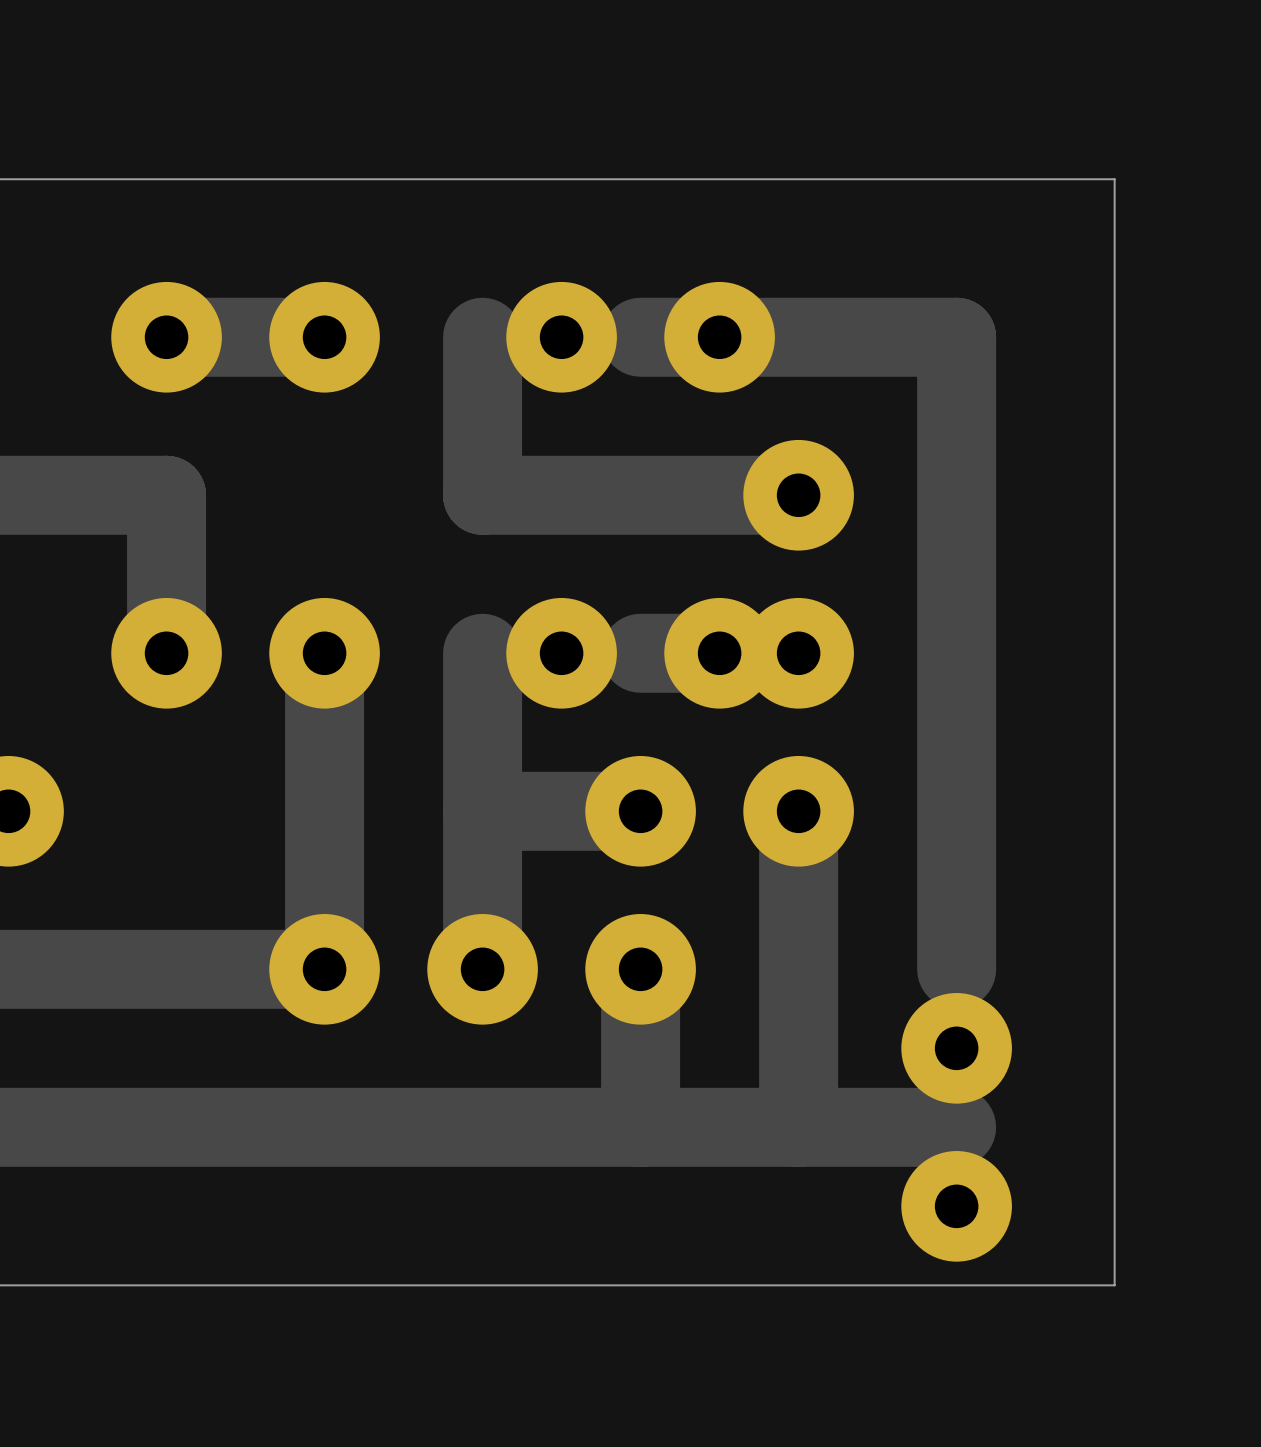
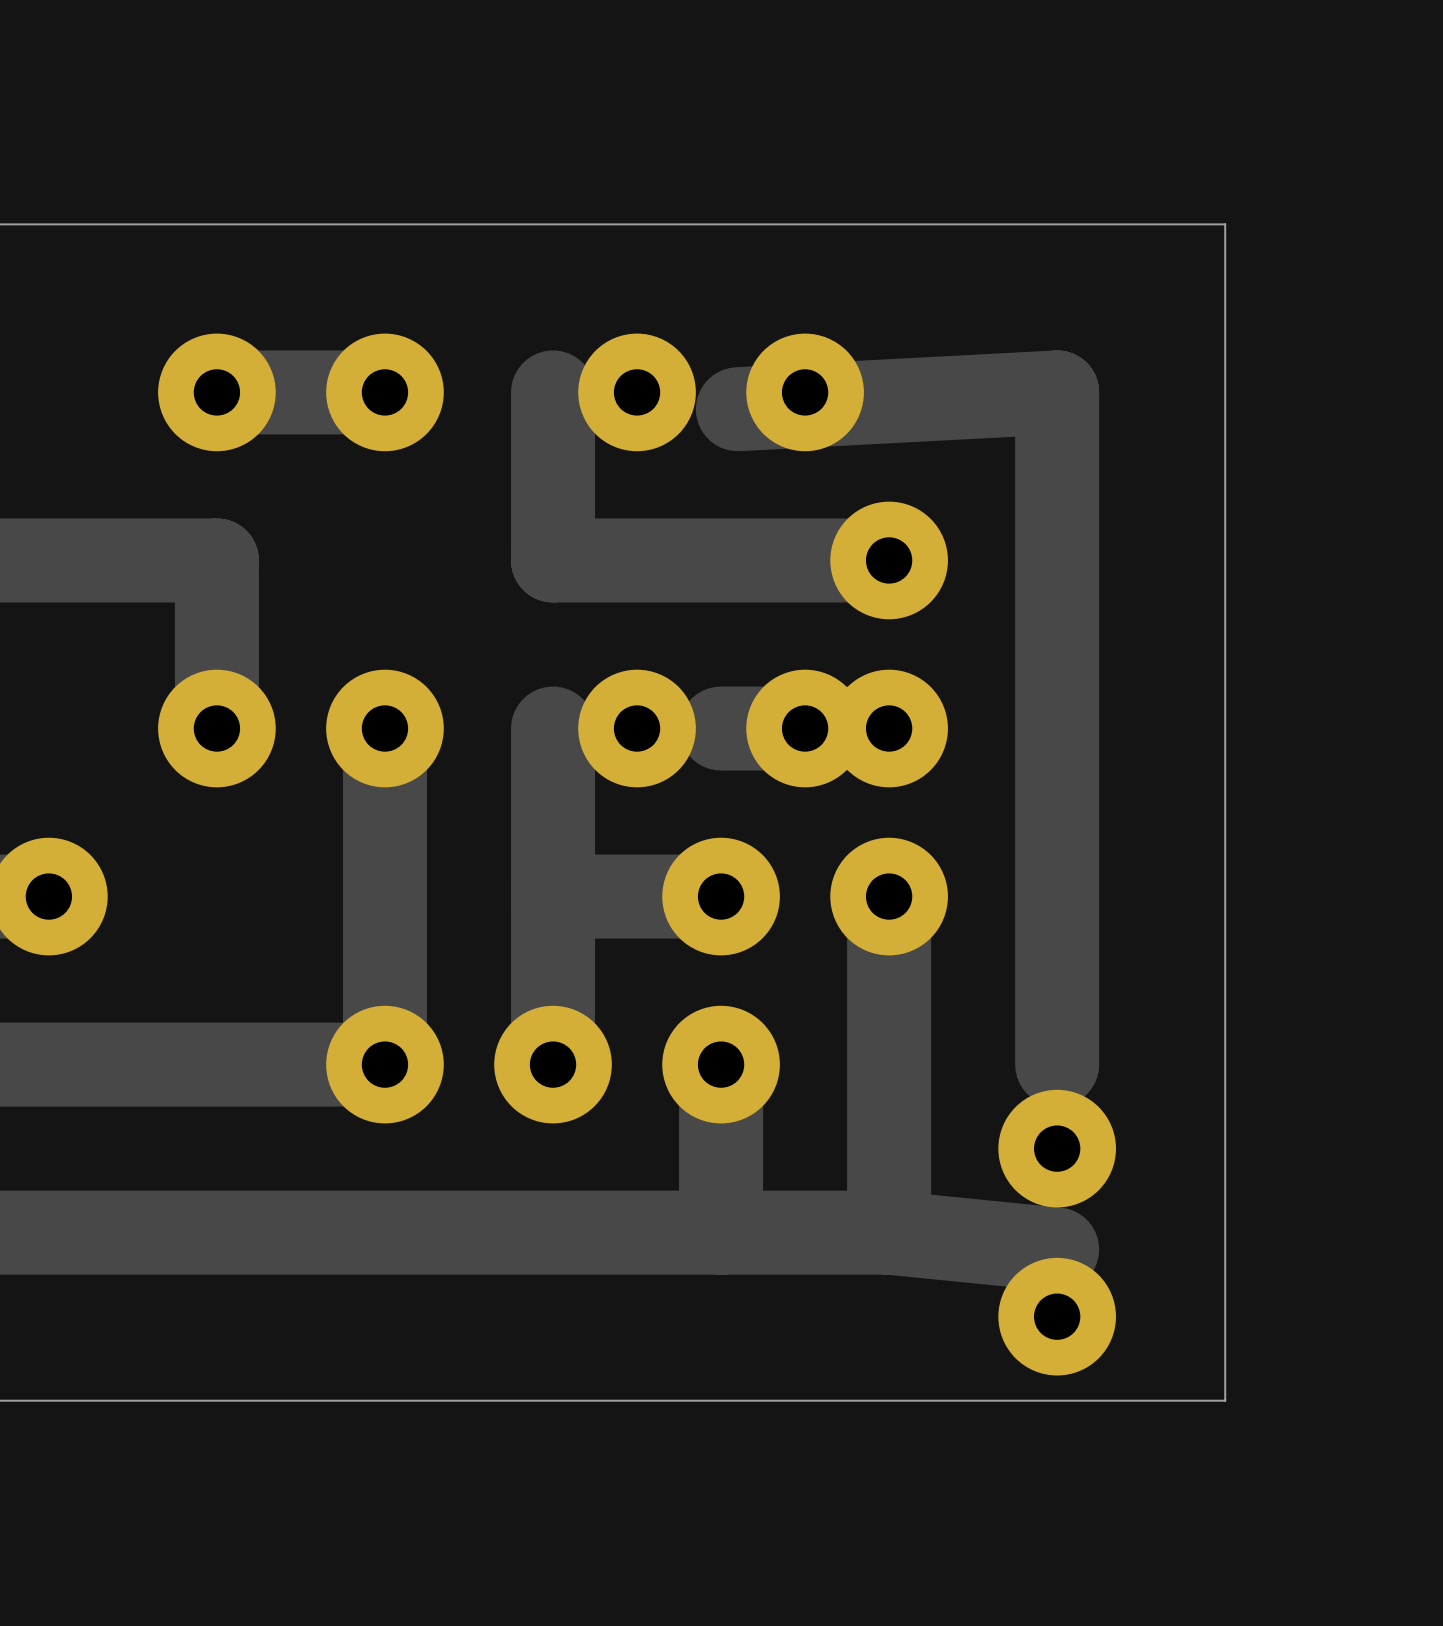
track: (956, 337) (640, 337) -> (1057, 392) (737, 409)
track: (956, 1127) (798, 1127) -> (1057, 1249) (889, 1232)

